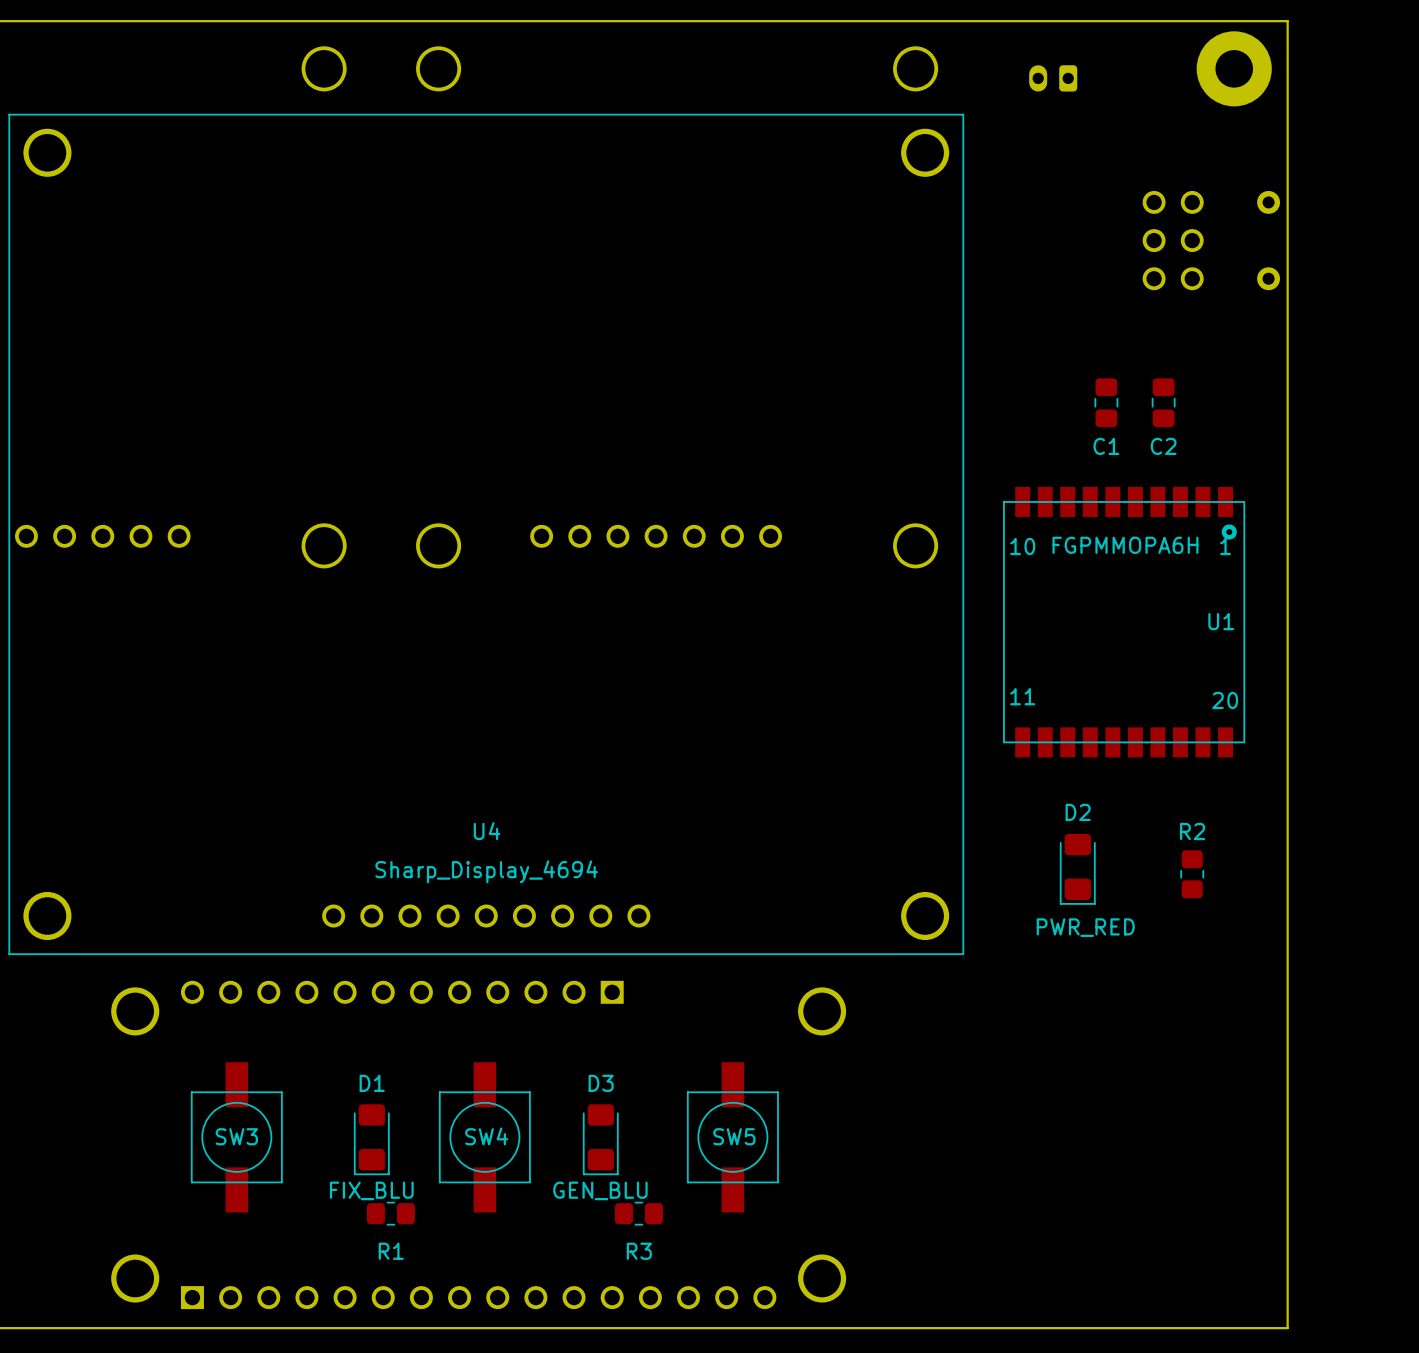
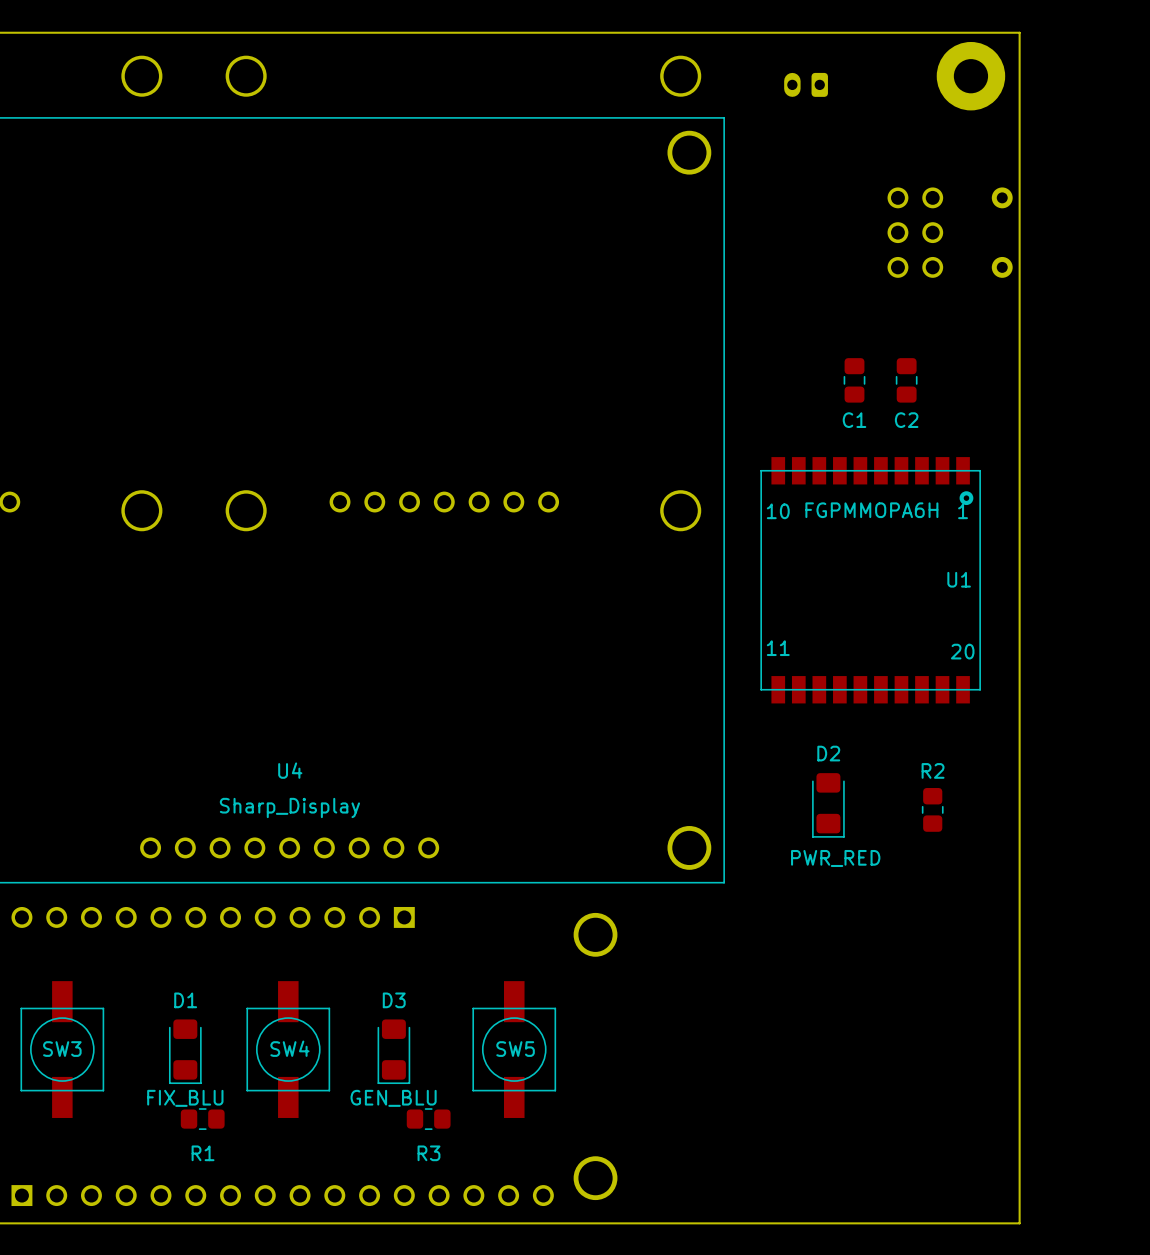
U4 value: Sharp_Display_4694 (486, 871) -> Sharp_Display (289, 807)

